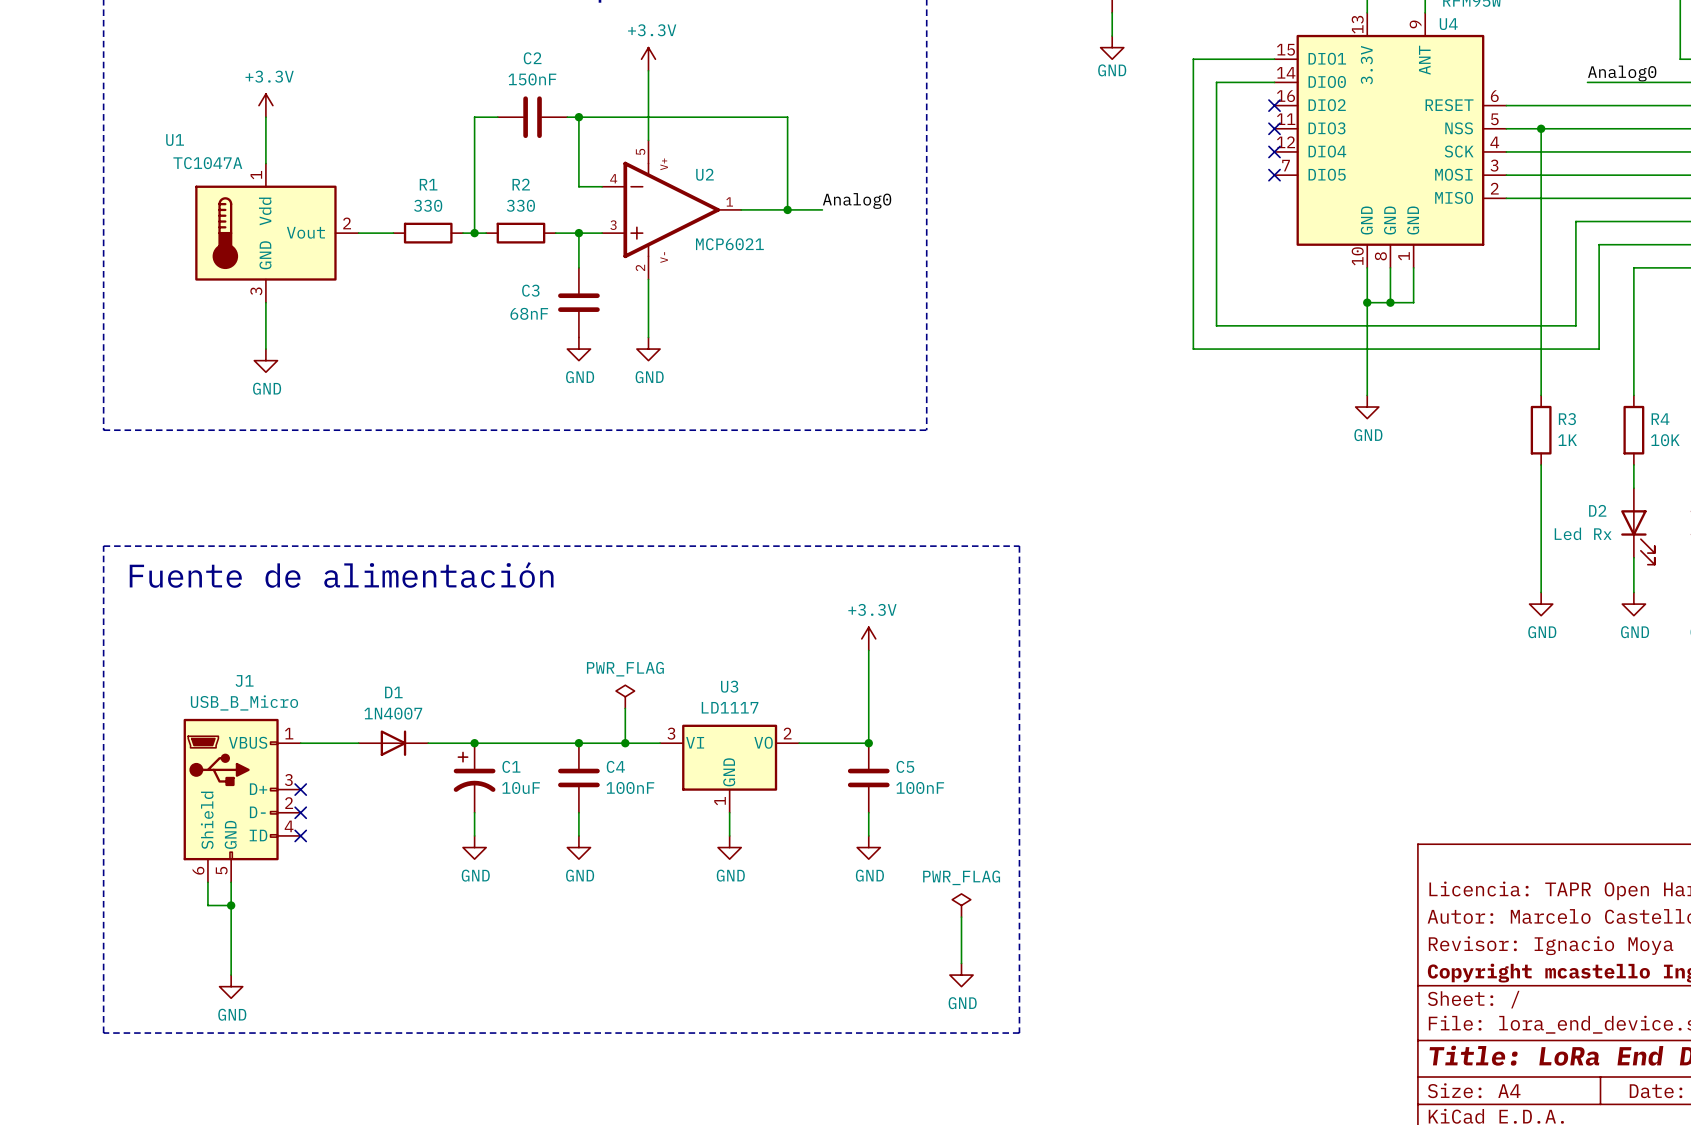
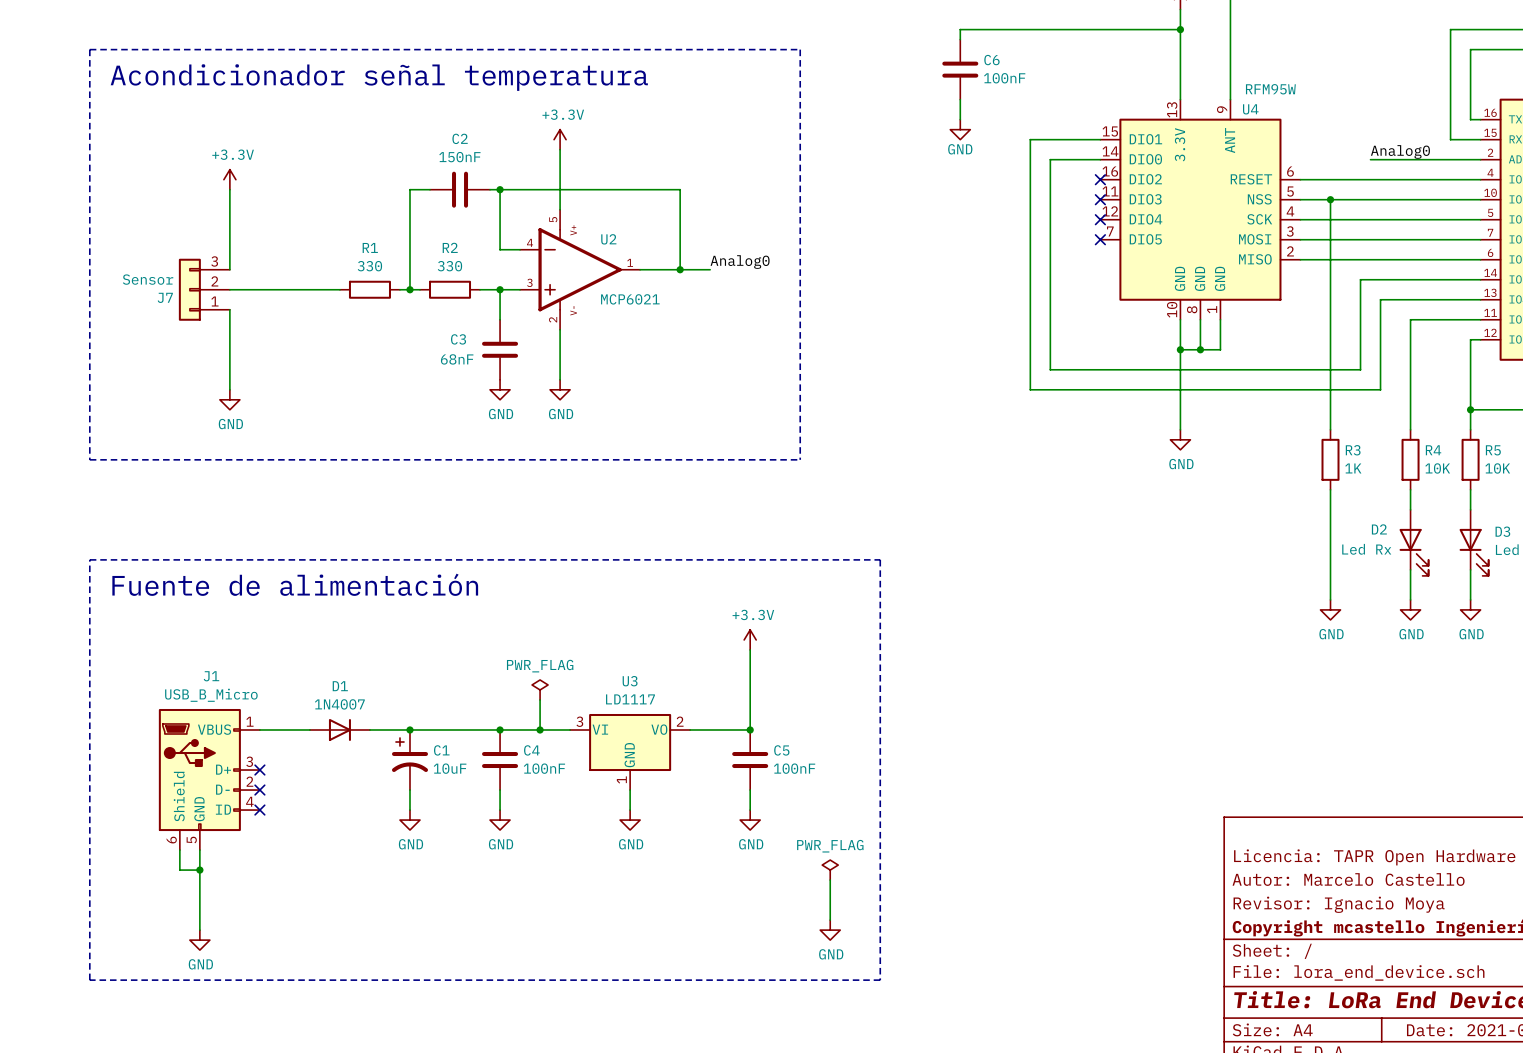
J7: none -> Sensor (204, 289)
U1: TC1047A (276, 233) -> none

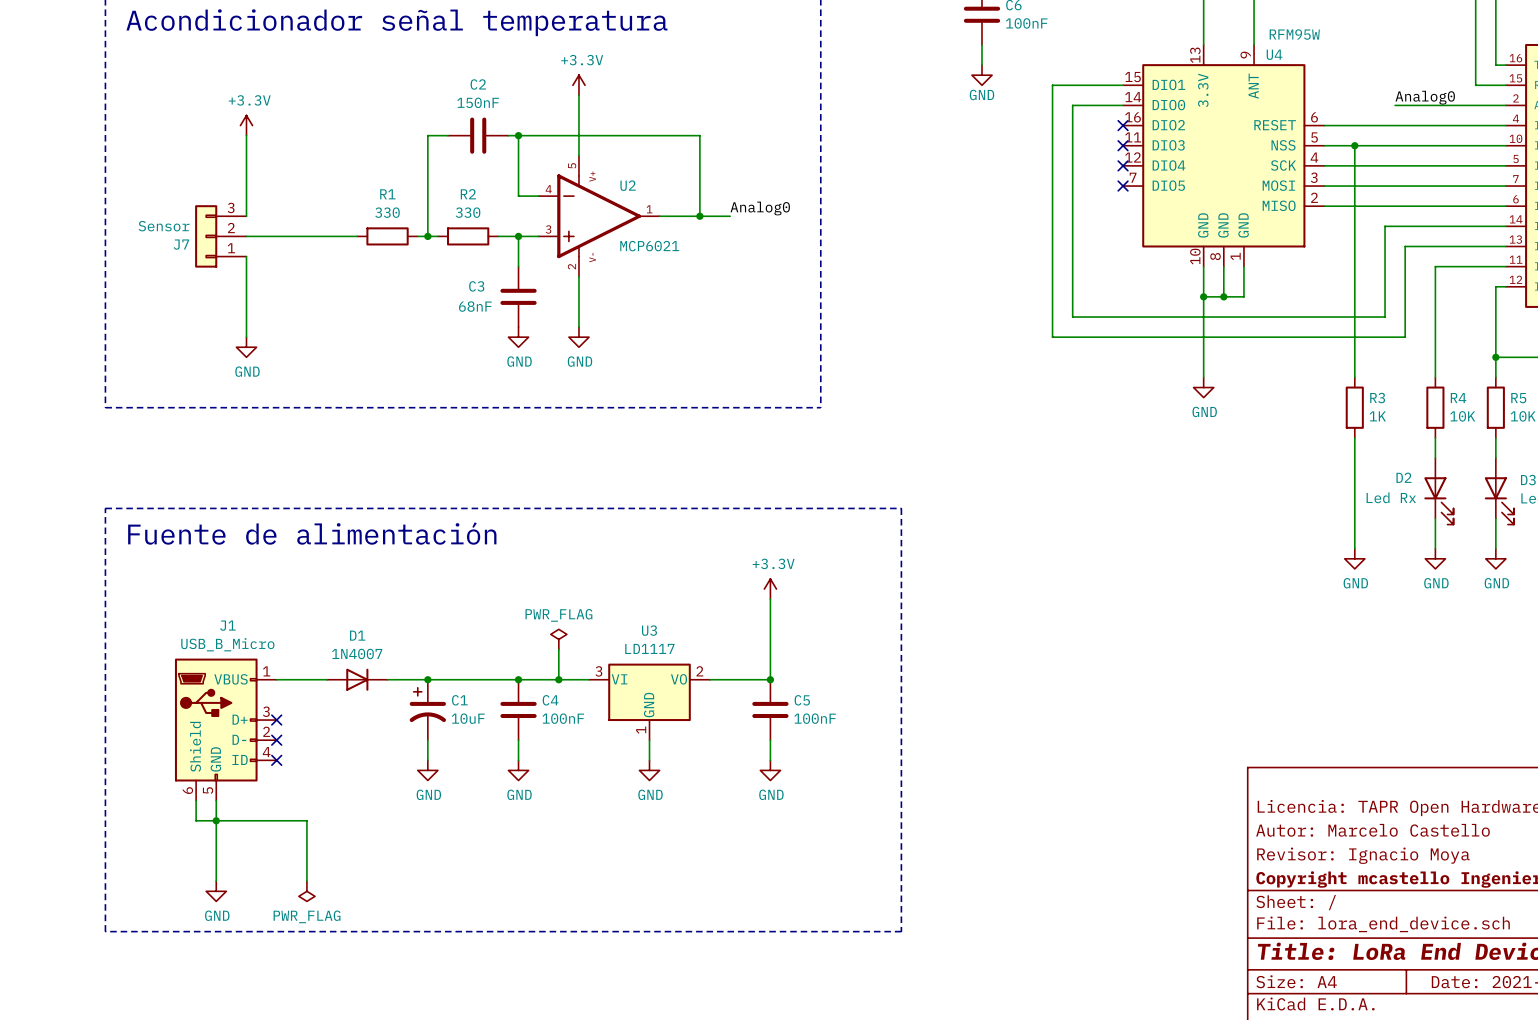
wire: none -> (216, 820) (306, 820) (306, 881)
power symbol: PWR_FLAG (830, 870) -> none
wire: (830, 880) (830, 920) -> none
power symbol: GND (830, 930) -> none
power symbol: none -> PWR_FLAG (306, 891)

